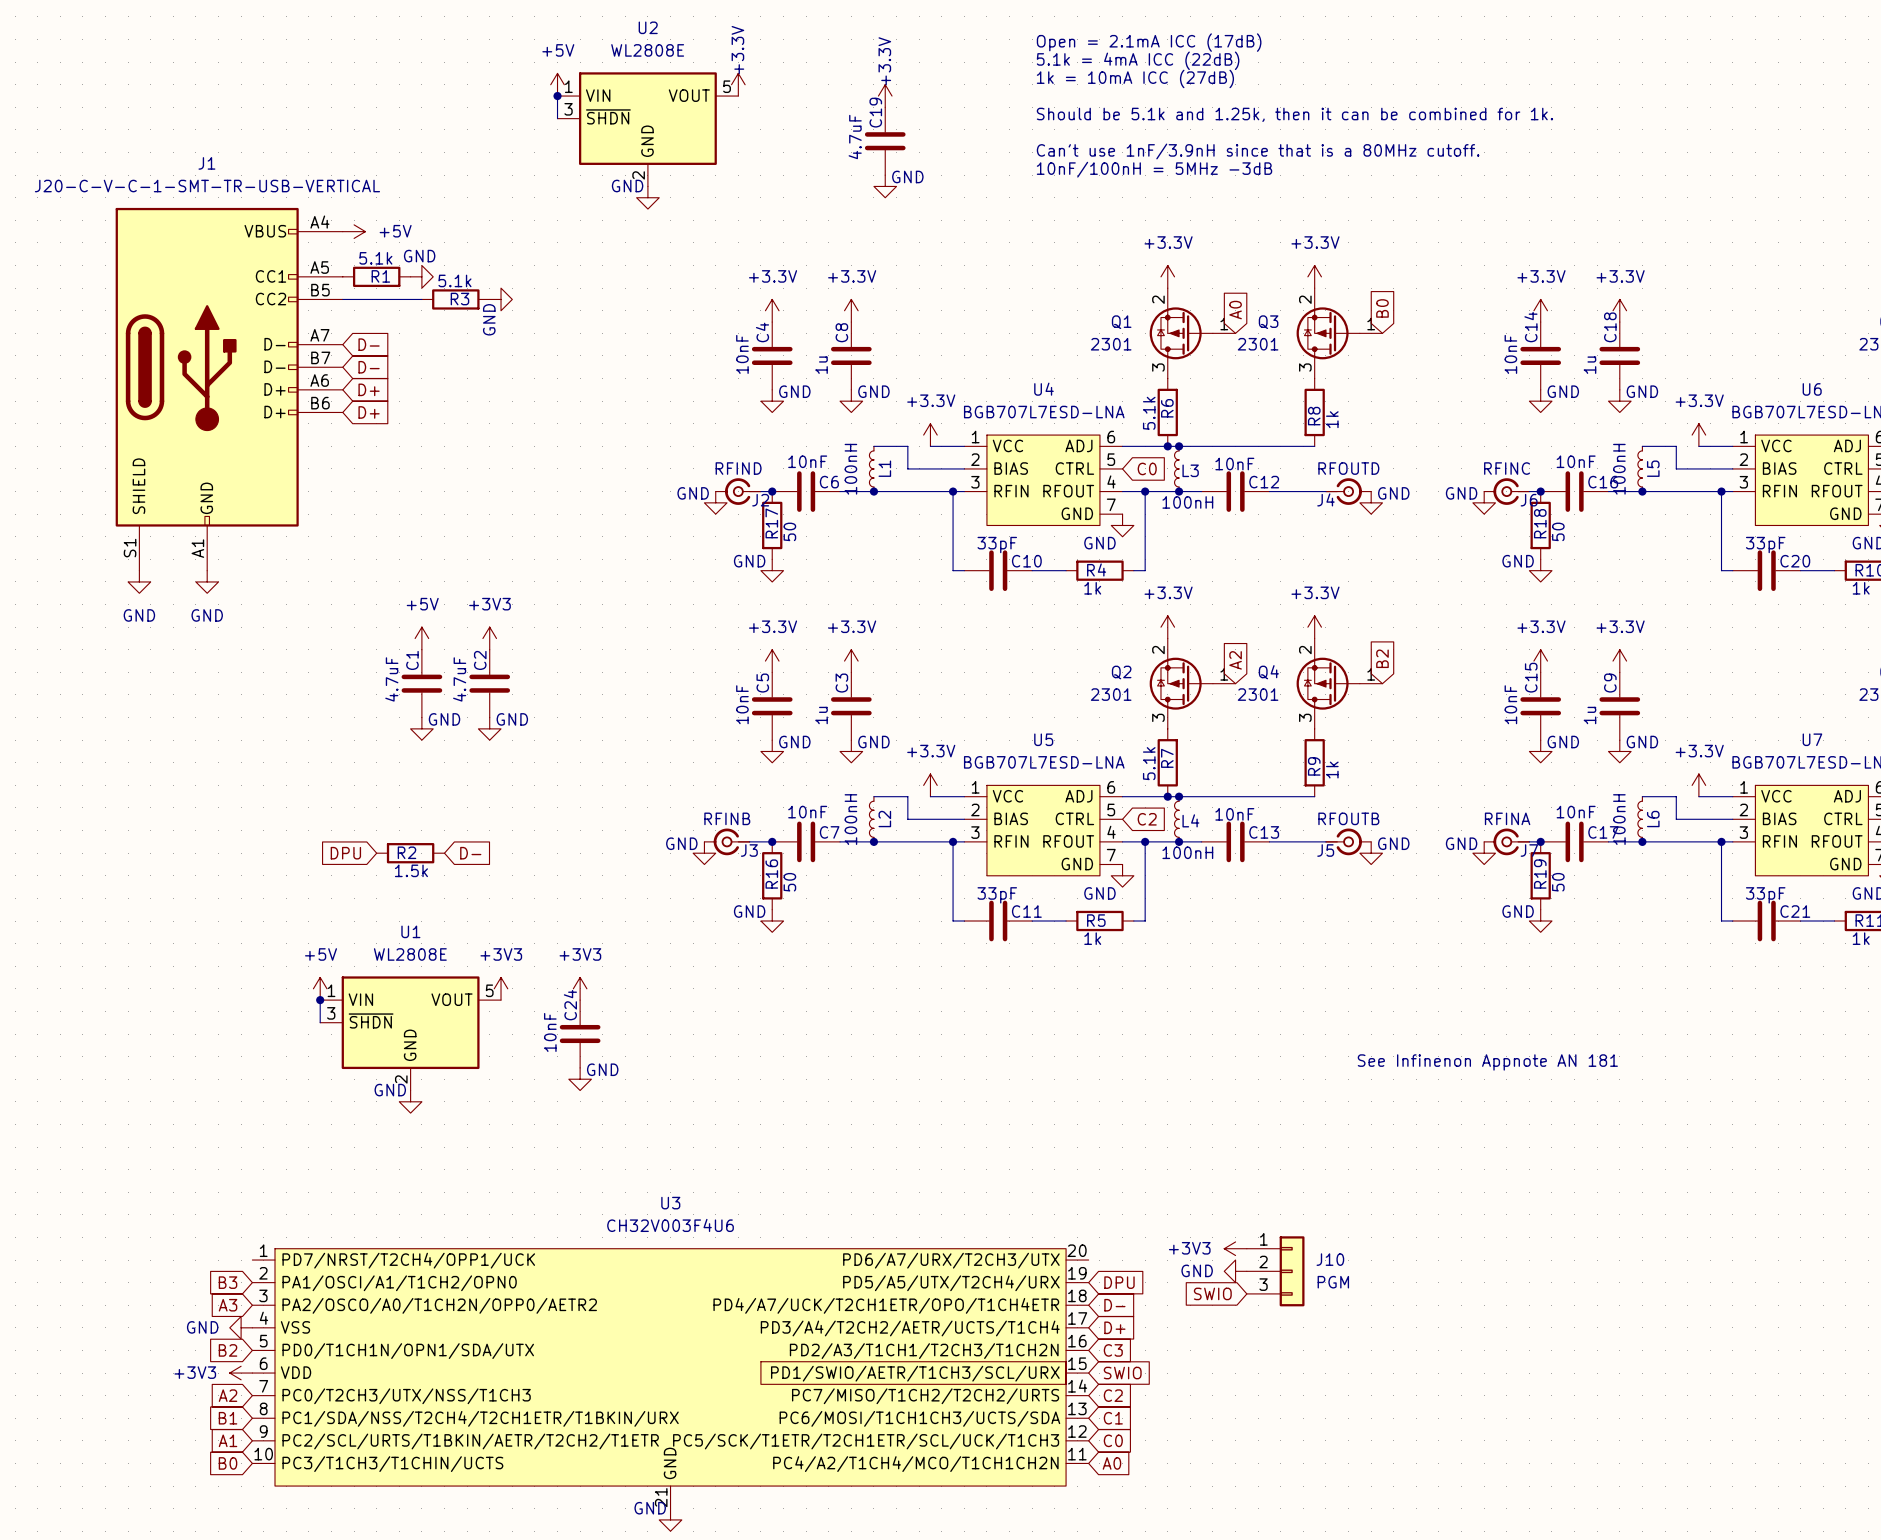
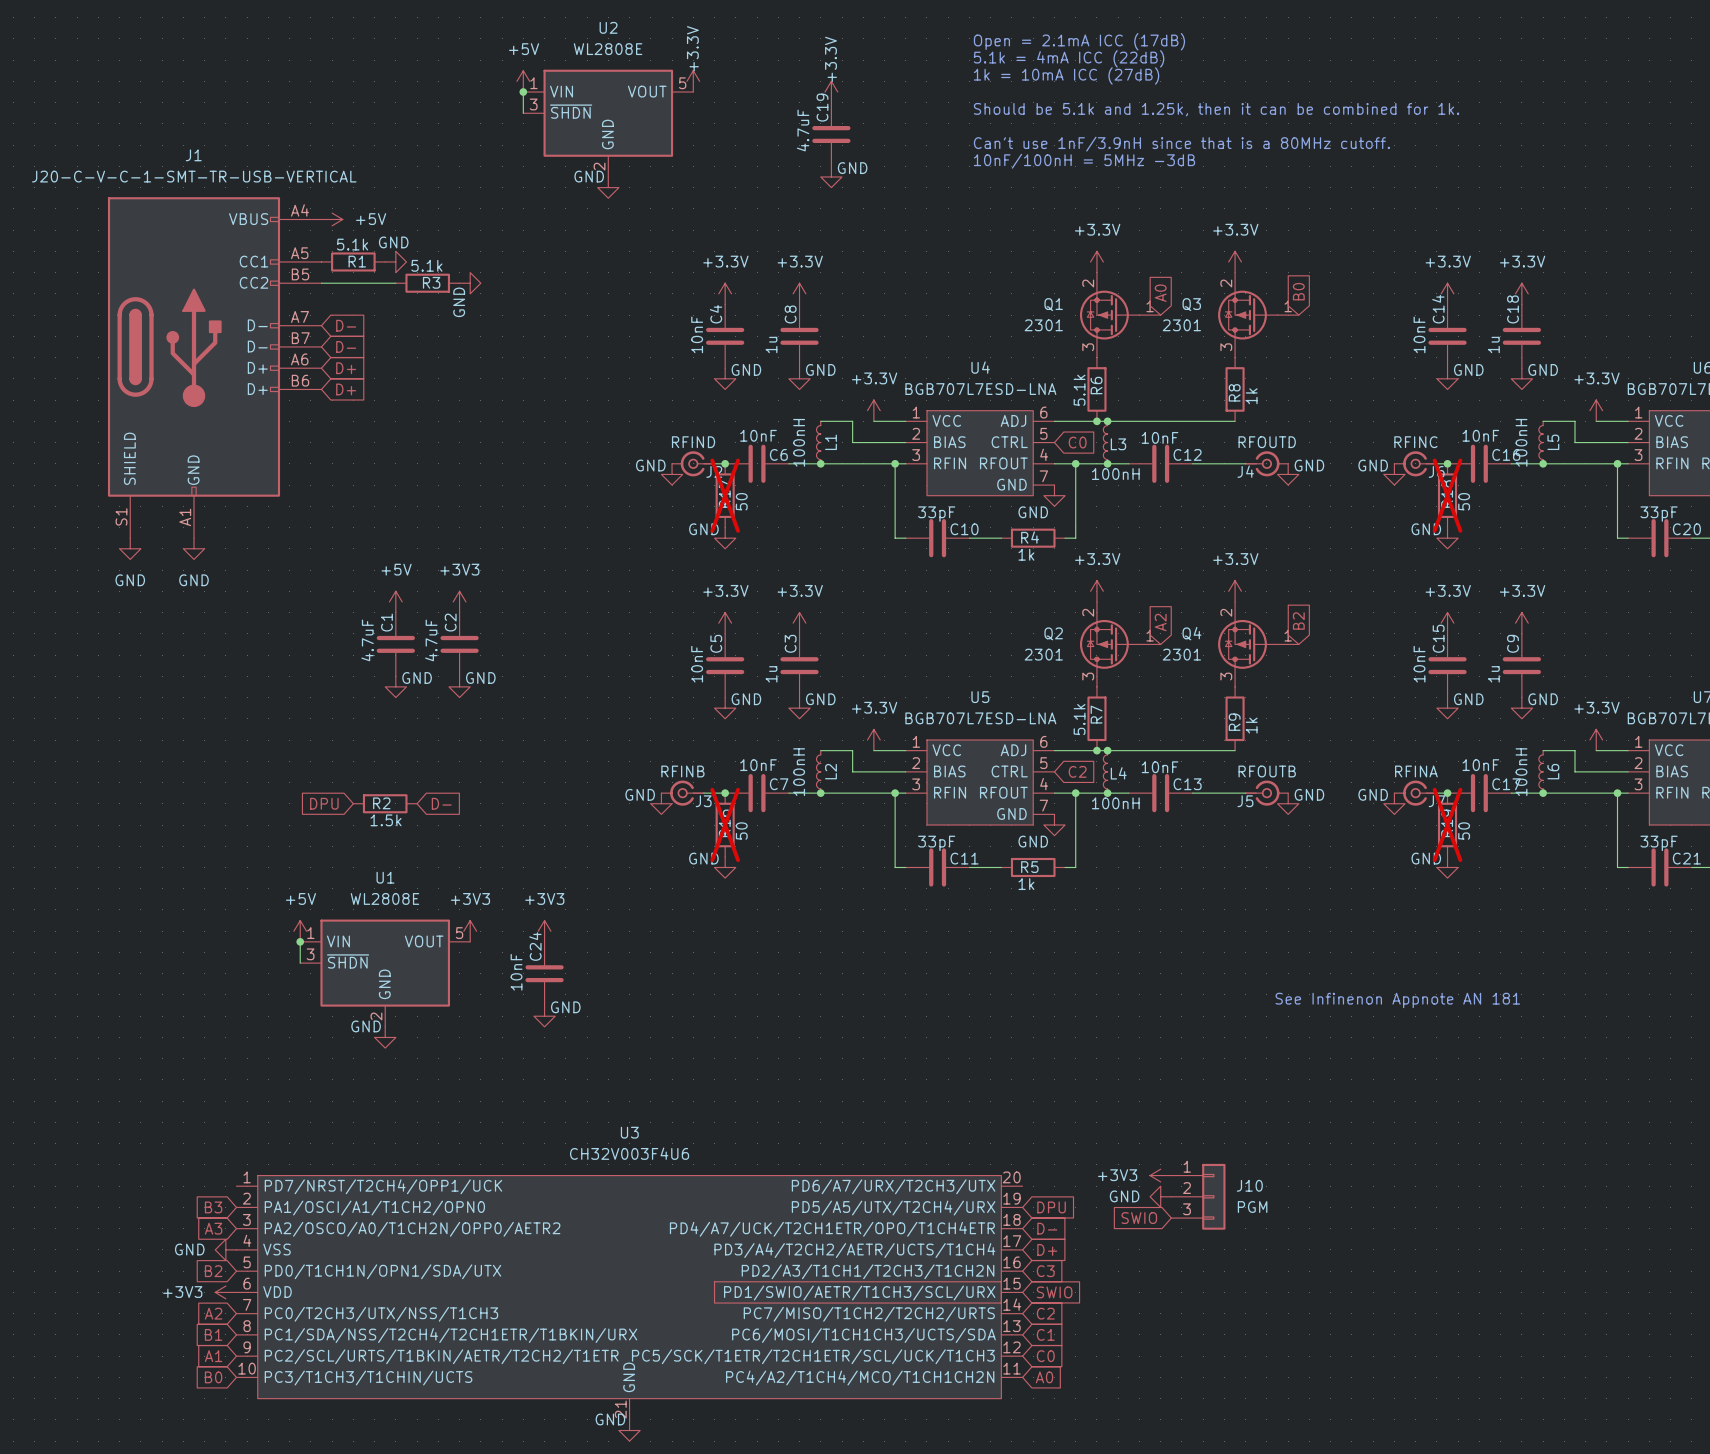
R17 do-not-place cross: none -> (725, 495)
R18 do-not-place cross: none -> (1447, 495)
R16 do-not-place cross: none -> (725, 825)
R19 do-not-place cross: none -> (1447, 825)

